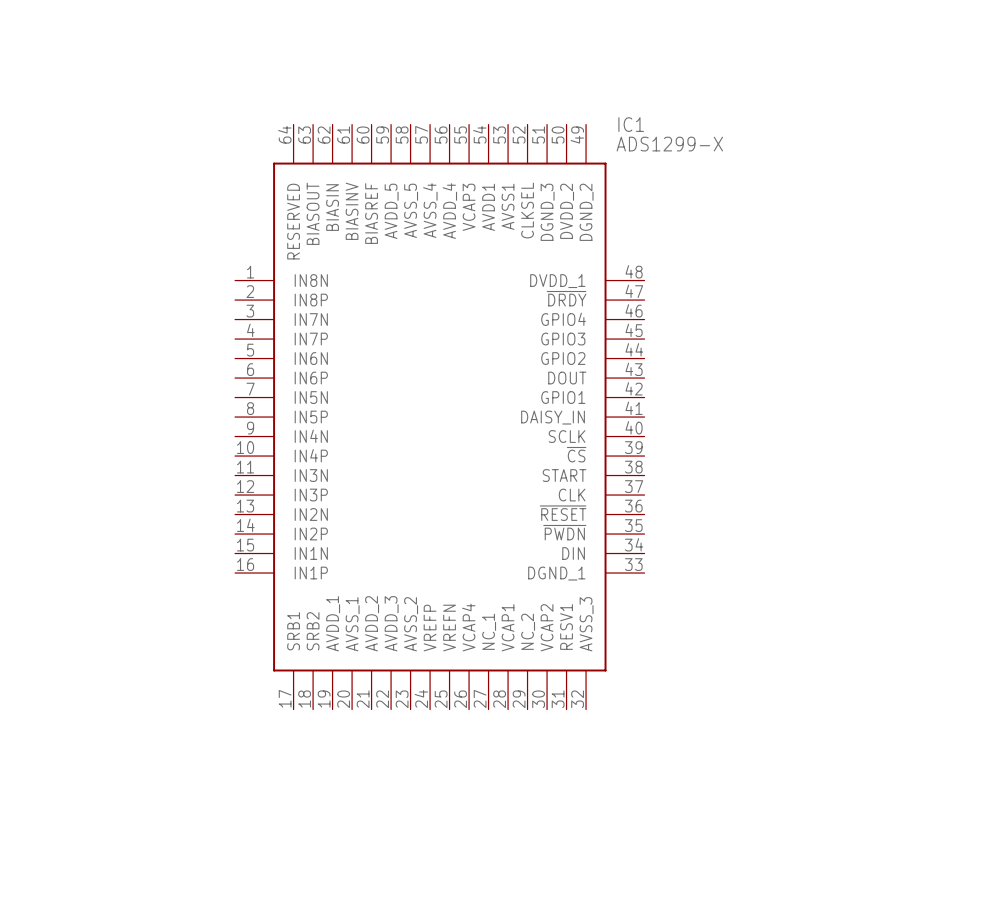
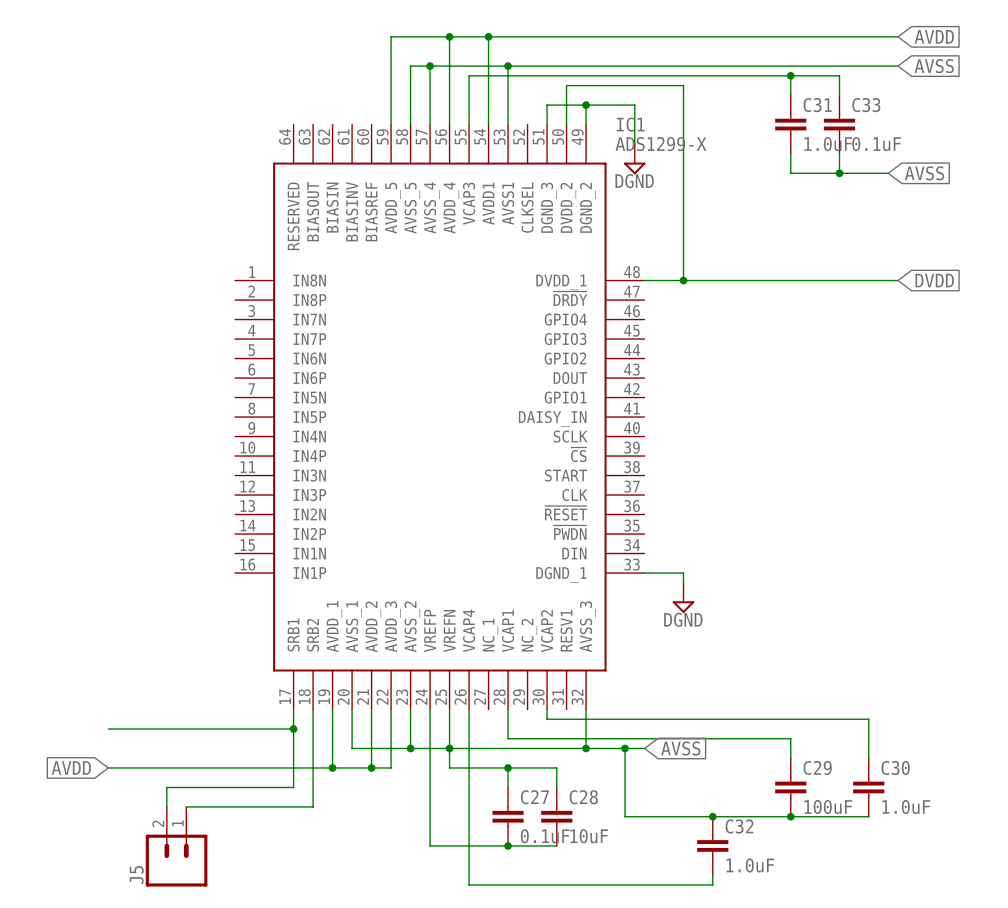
wire: none -> (449, 36) (449, 124)
junction: none -> (449, 36)
wire: none -> (488, 36) (488, 124)
junction: none -> (488, 36)
wire: none -> (897, 36) (391, 36) (391, 124)
global label: none -> AVDD (934, 36)
wire: none -> (430, 66) (430, 124)
junction: none -> (430, 66)
wire: none -> (508, 66) (508, 124)
junction: none -> (508, 66)
wire: none -> (897, 66) (410, 66) (410, 124)
global label: none -> AVSS (934, 66)
wire: none -> (790, 75) (790, 95)
junction: none -> (790, 75)
wire: none -> (839, 95) (839, 75) (469, 75) (469, 124)
wire: none -> (586, 105) (586, 124)
junction: none -> (586, 105)
wire: none -> (547, 124) (547, 105) (634, 105) (634, 144)
wire: none -> (566, 124) (566, 85) (683, 85) (683, 280)
C31: none -> 1.0uF (790, 124)
C33: none -> 0.1uF (839, 124)
wire: none -> (790, 153) (790, 173) (888, 173)
wire: none -> (839, 153) (839, 173)
power symbol: none -> DGND (634, 159)
junction: none -> (839, 173)
global label: none -> AVSS (924, 173)
wire: none -> (644, 280) (897, 280)
junction: none -> (683, 280)
global label: none -> DVDD (934, 280)
wire: none -> (644, 573) (683, 573) (683, 582)
power symbol: none -> DGND (683, 597)
wire: none -> (293, 709) (293, 787) (166, 787) (166, 806)
wire: none -> (313, 709) (313, 806) (186, 806)
wire: none -> (332, 709) (332, 767)
wire: none -> (352, 709) (352, 748) (644, 748)
wire: none -> (371, 709) (371, 767)
wire: none -> (391, 709) (391, 767) (108, 767)
wire: none -> (410, 709) (410, 748)
wire: none -> (430, 709) (430, 845) (556, 845)
wire: none -> (449, 709) (449, 767) (556, 767) (556, 787)
wire: none -> (469, 709) (469, 884) (712, 884) (712, 875)
wire: none -> (508, 709) (508, 738) (790, 738) (790, 758)
wire: none -> (547, 709) (547, 719) (868, 719) (868, 758)
wire: none -> (586, 709) (586, 748)
wire: none -> (108, 728) (293, 728)
junction: none -> (293, 728)
junction: none -> (410, 748)
junction: none -> (449, 748)
junction: none -> (586, 748)
wire: none -> (625, 748) (625, 816) (868, 816)
junction: none -> (625, 748)
global label: none -> AVSS (680, 748)
global label: none -> AVDD (71, 767)
junction: none -> (332, 767)
junction: none -> (371, 767)
wire: none -> (508, 767) (508, 787)
junction: none -> (508, 767)
C29: none -> 100uF (790, 787)
C30: none -> 1.0uF (868, 787)
C27: none -> 0.1uF (508, 816)
C28: none -> 10uF (556, 816)
junction: none -> (712, 816)
junction: none -> (790, 816)
junction: none -> (508, 845)
C32: none -> 1.0uF (712, 845)
J5: none -> (176, 846)

